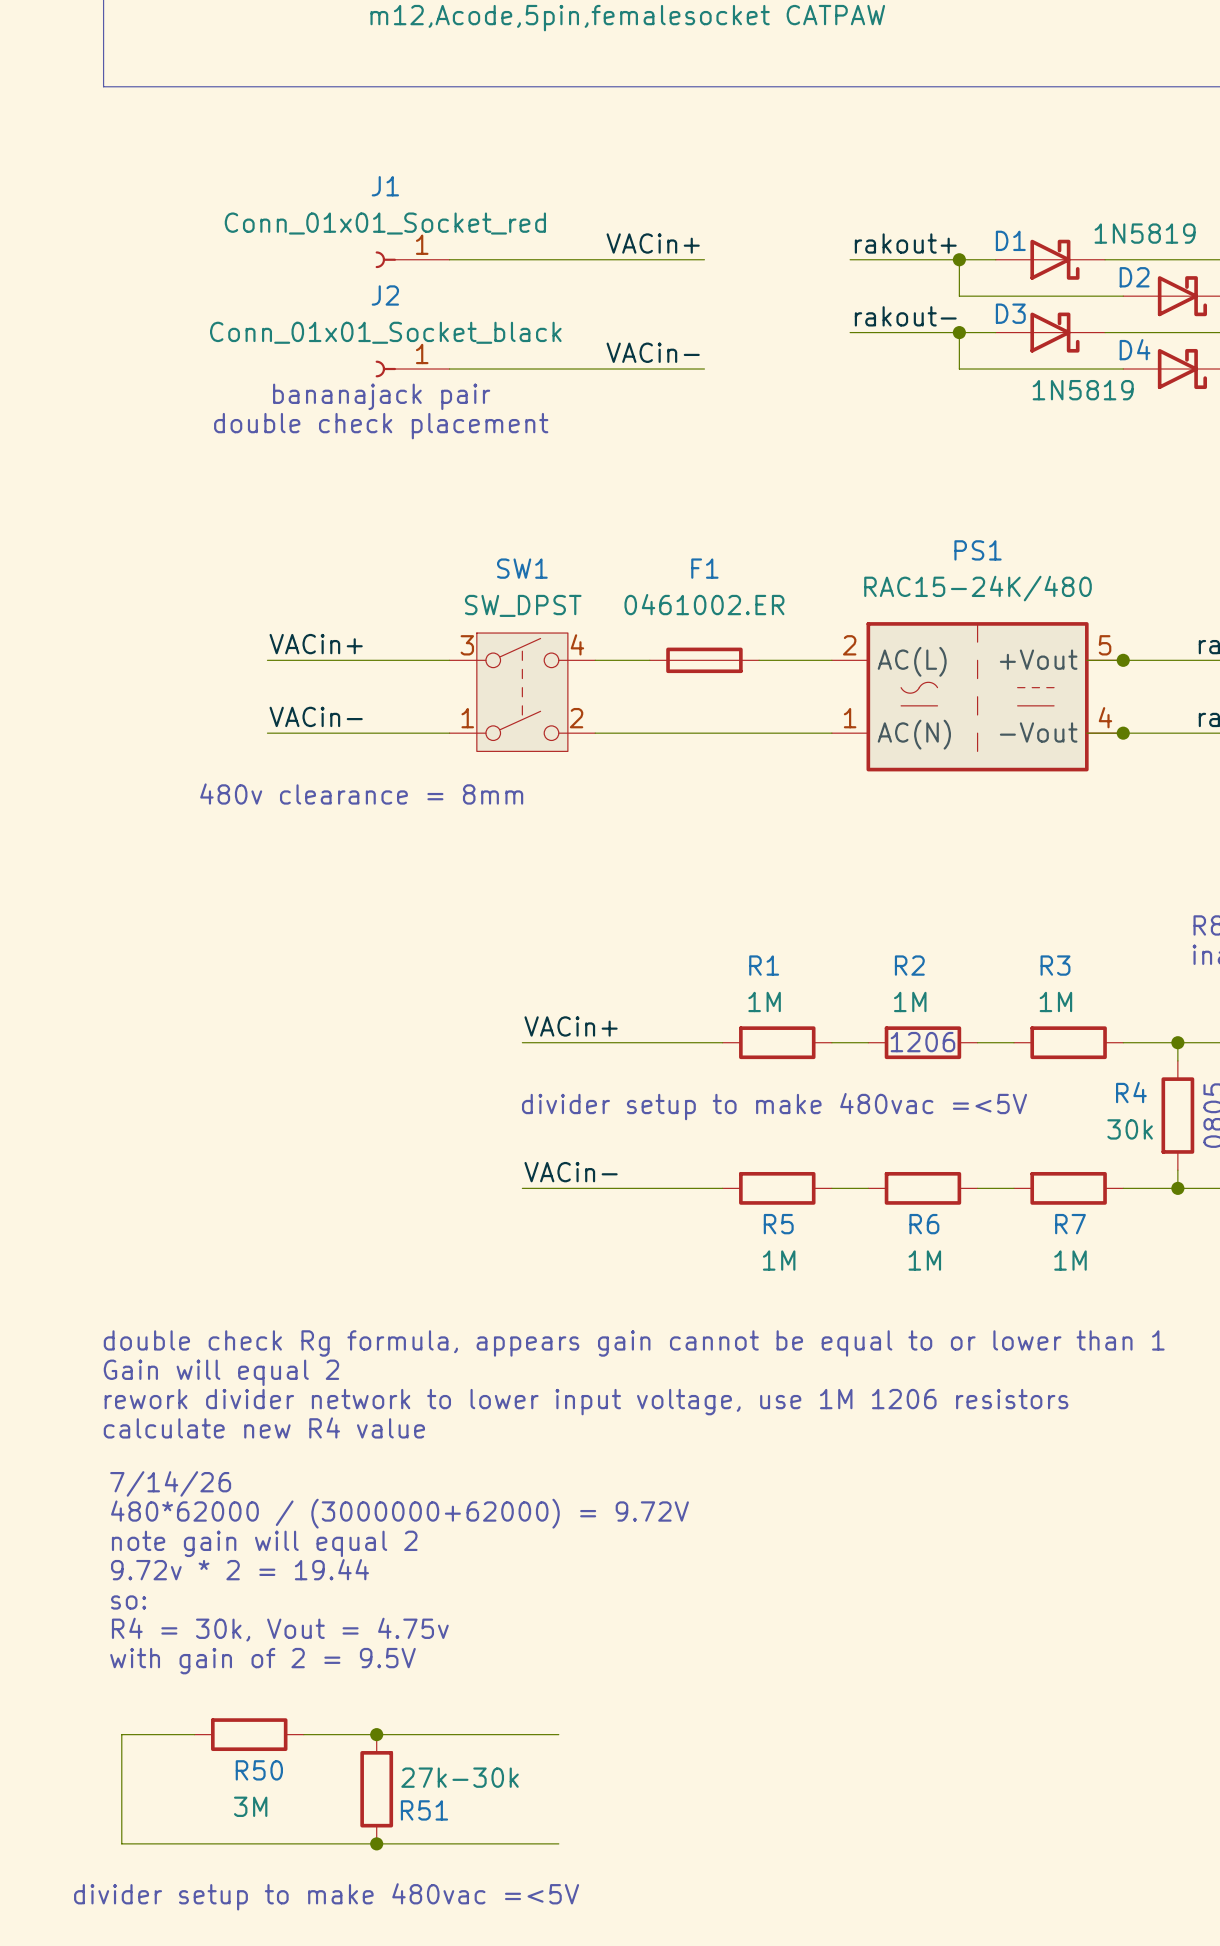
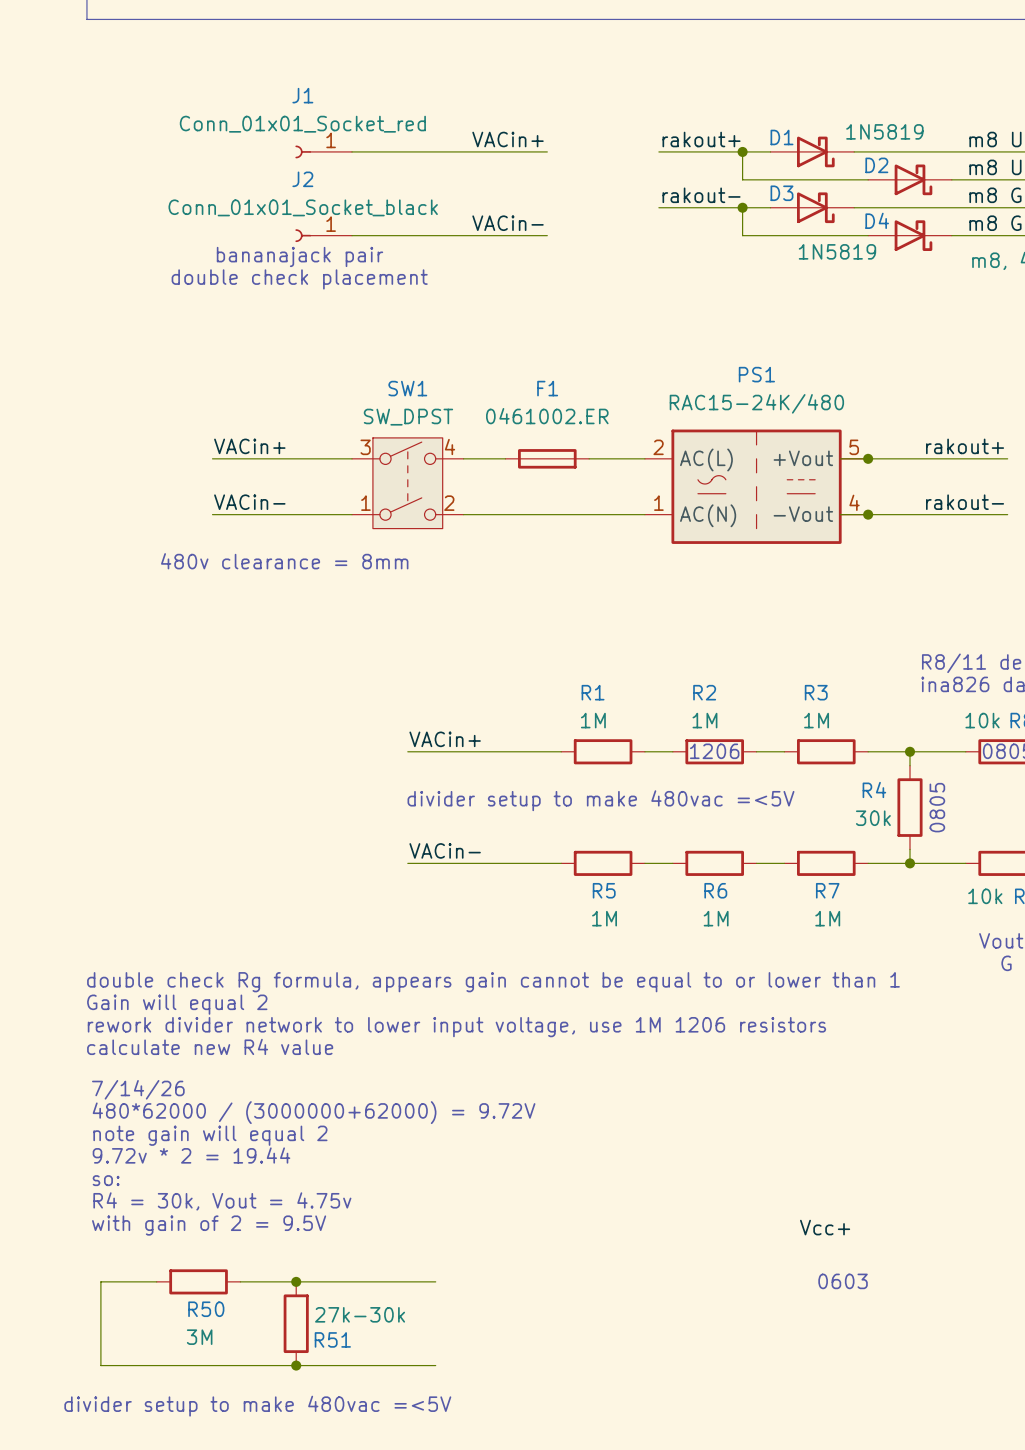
label: none -> Vcc+ (825, 1227)
text: none -> 0603 (843, 1281)

